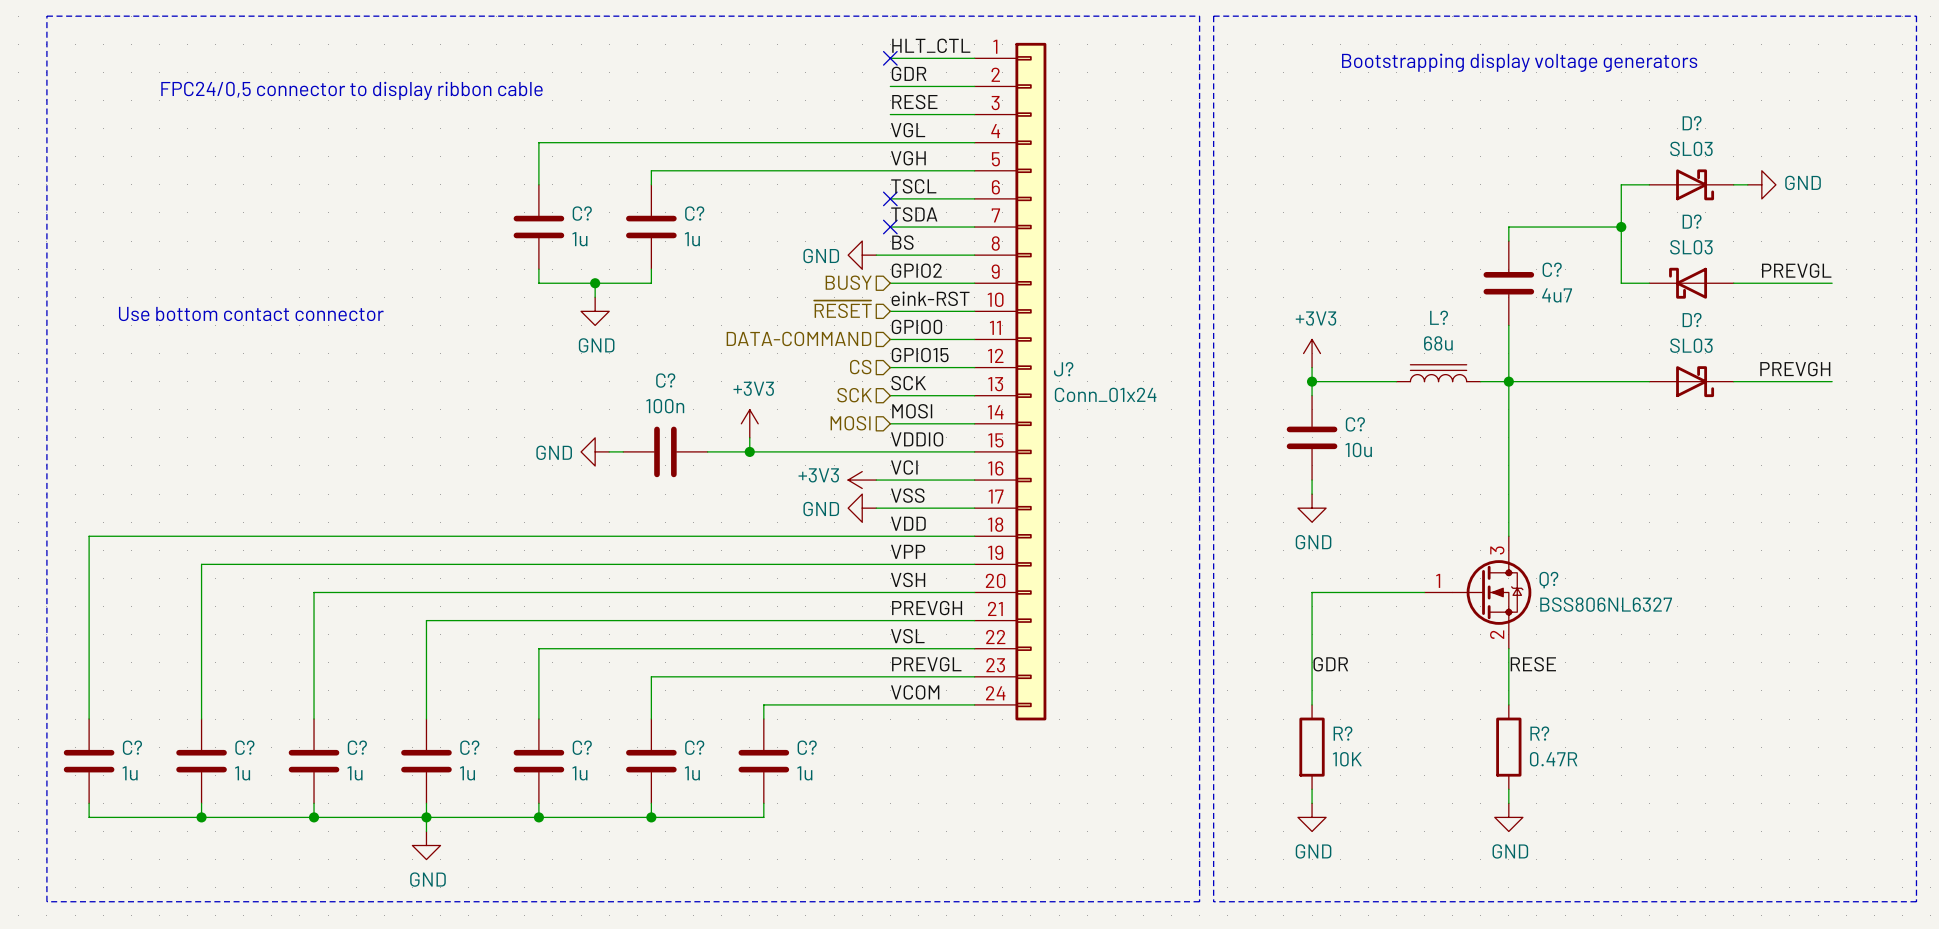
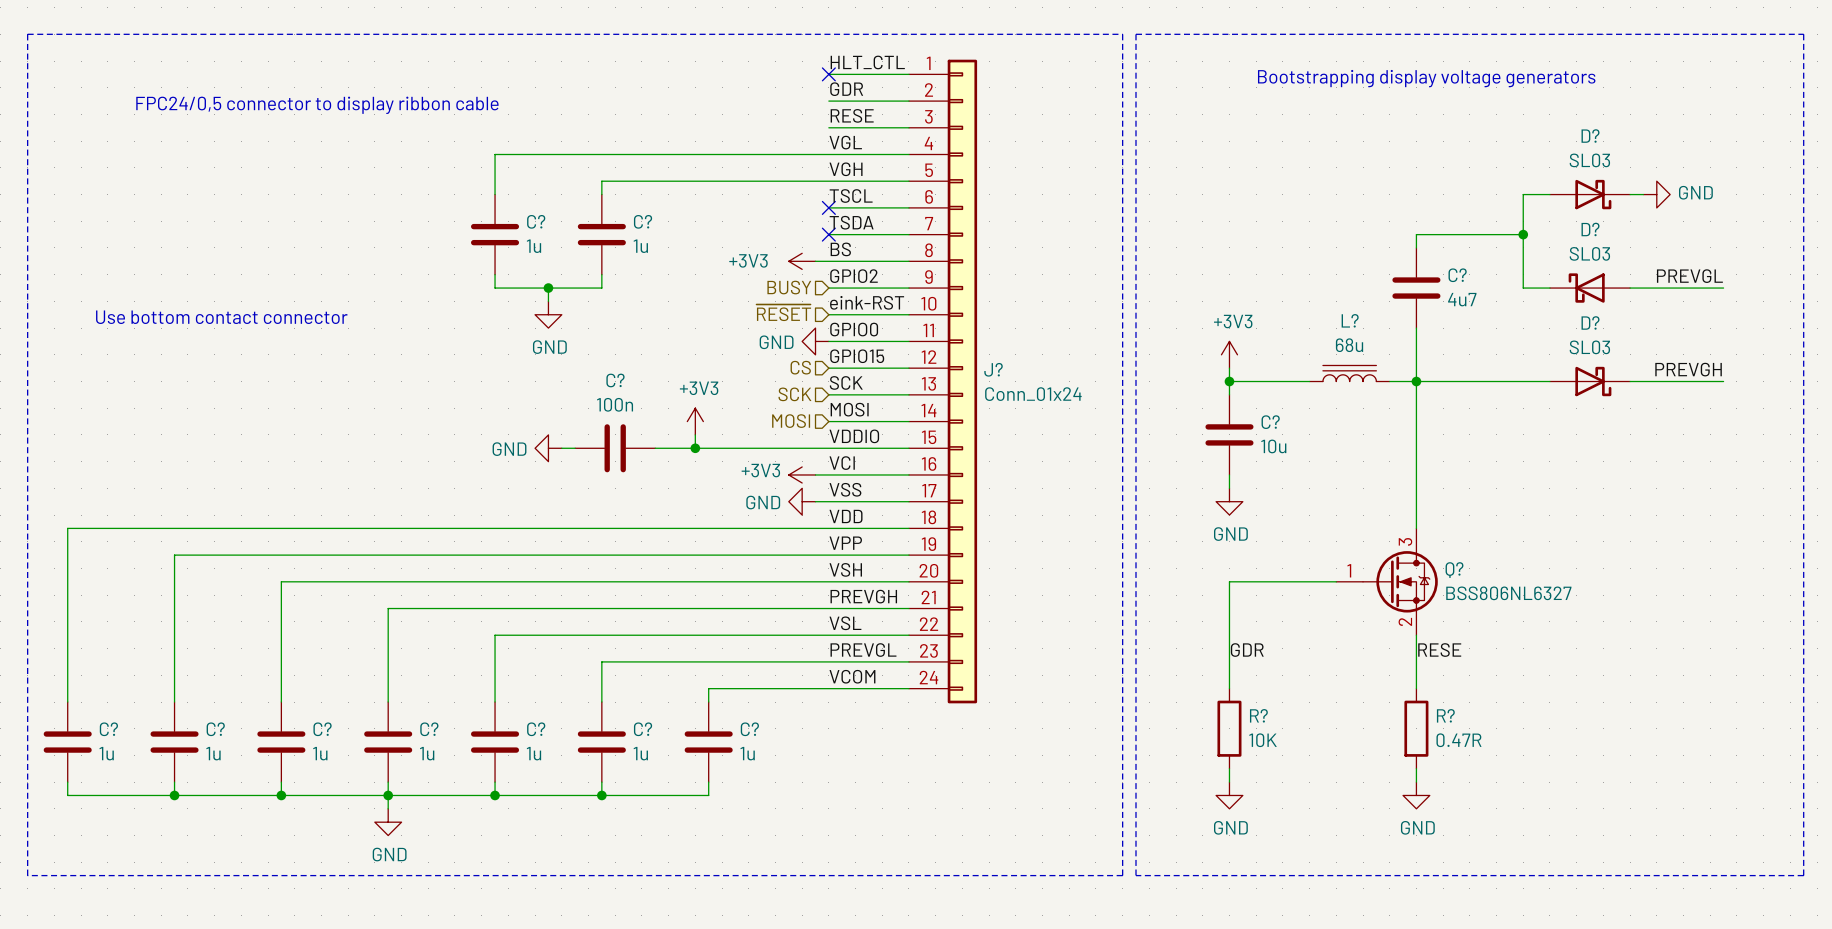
power symbol: GND (862, 255) -> +3V3 (802, 261)
hierarchical label: DATA-COMMAND (798, 338) -> none
power symbol: none -> GND (815, 341)

